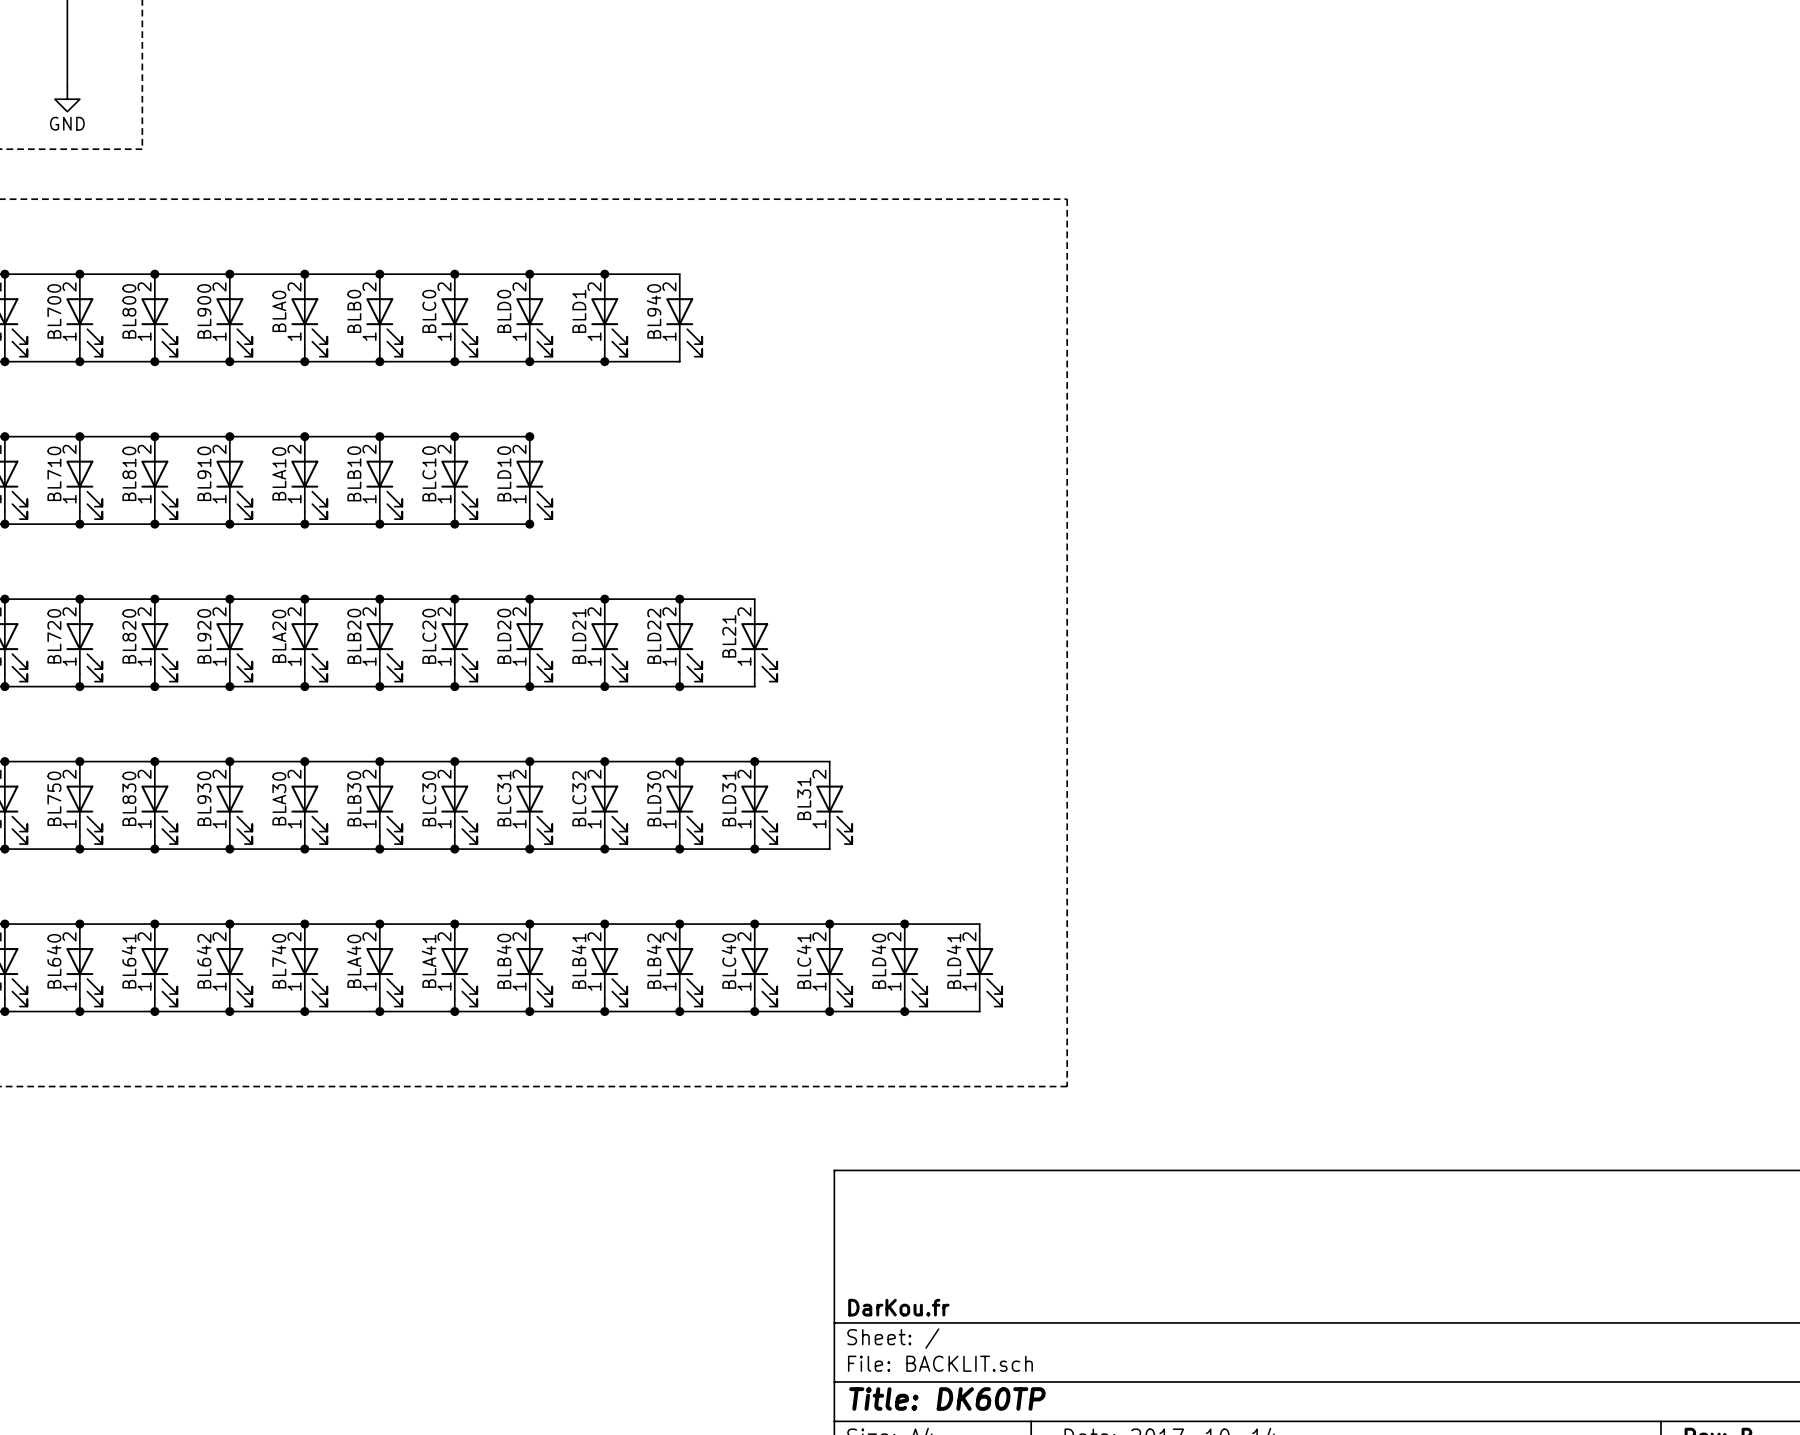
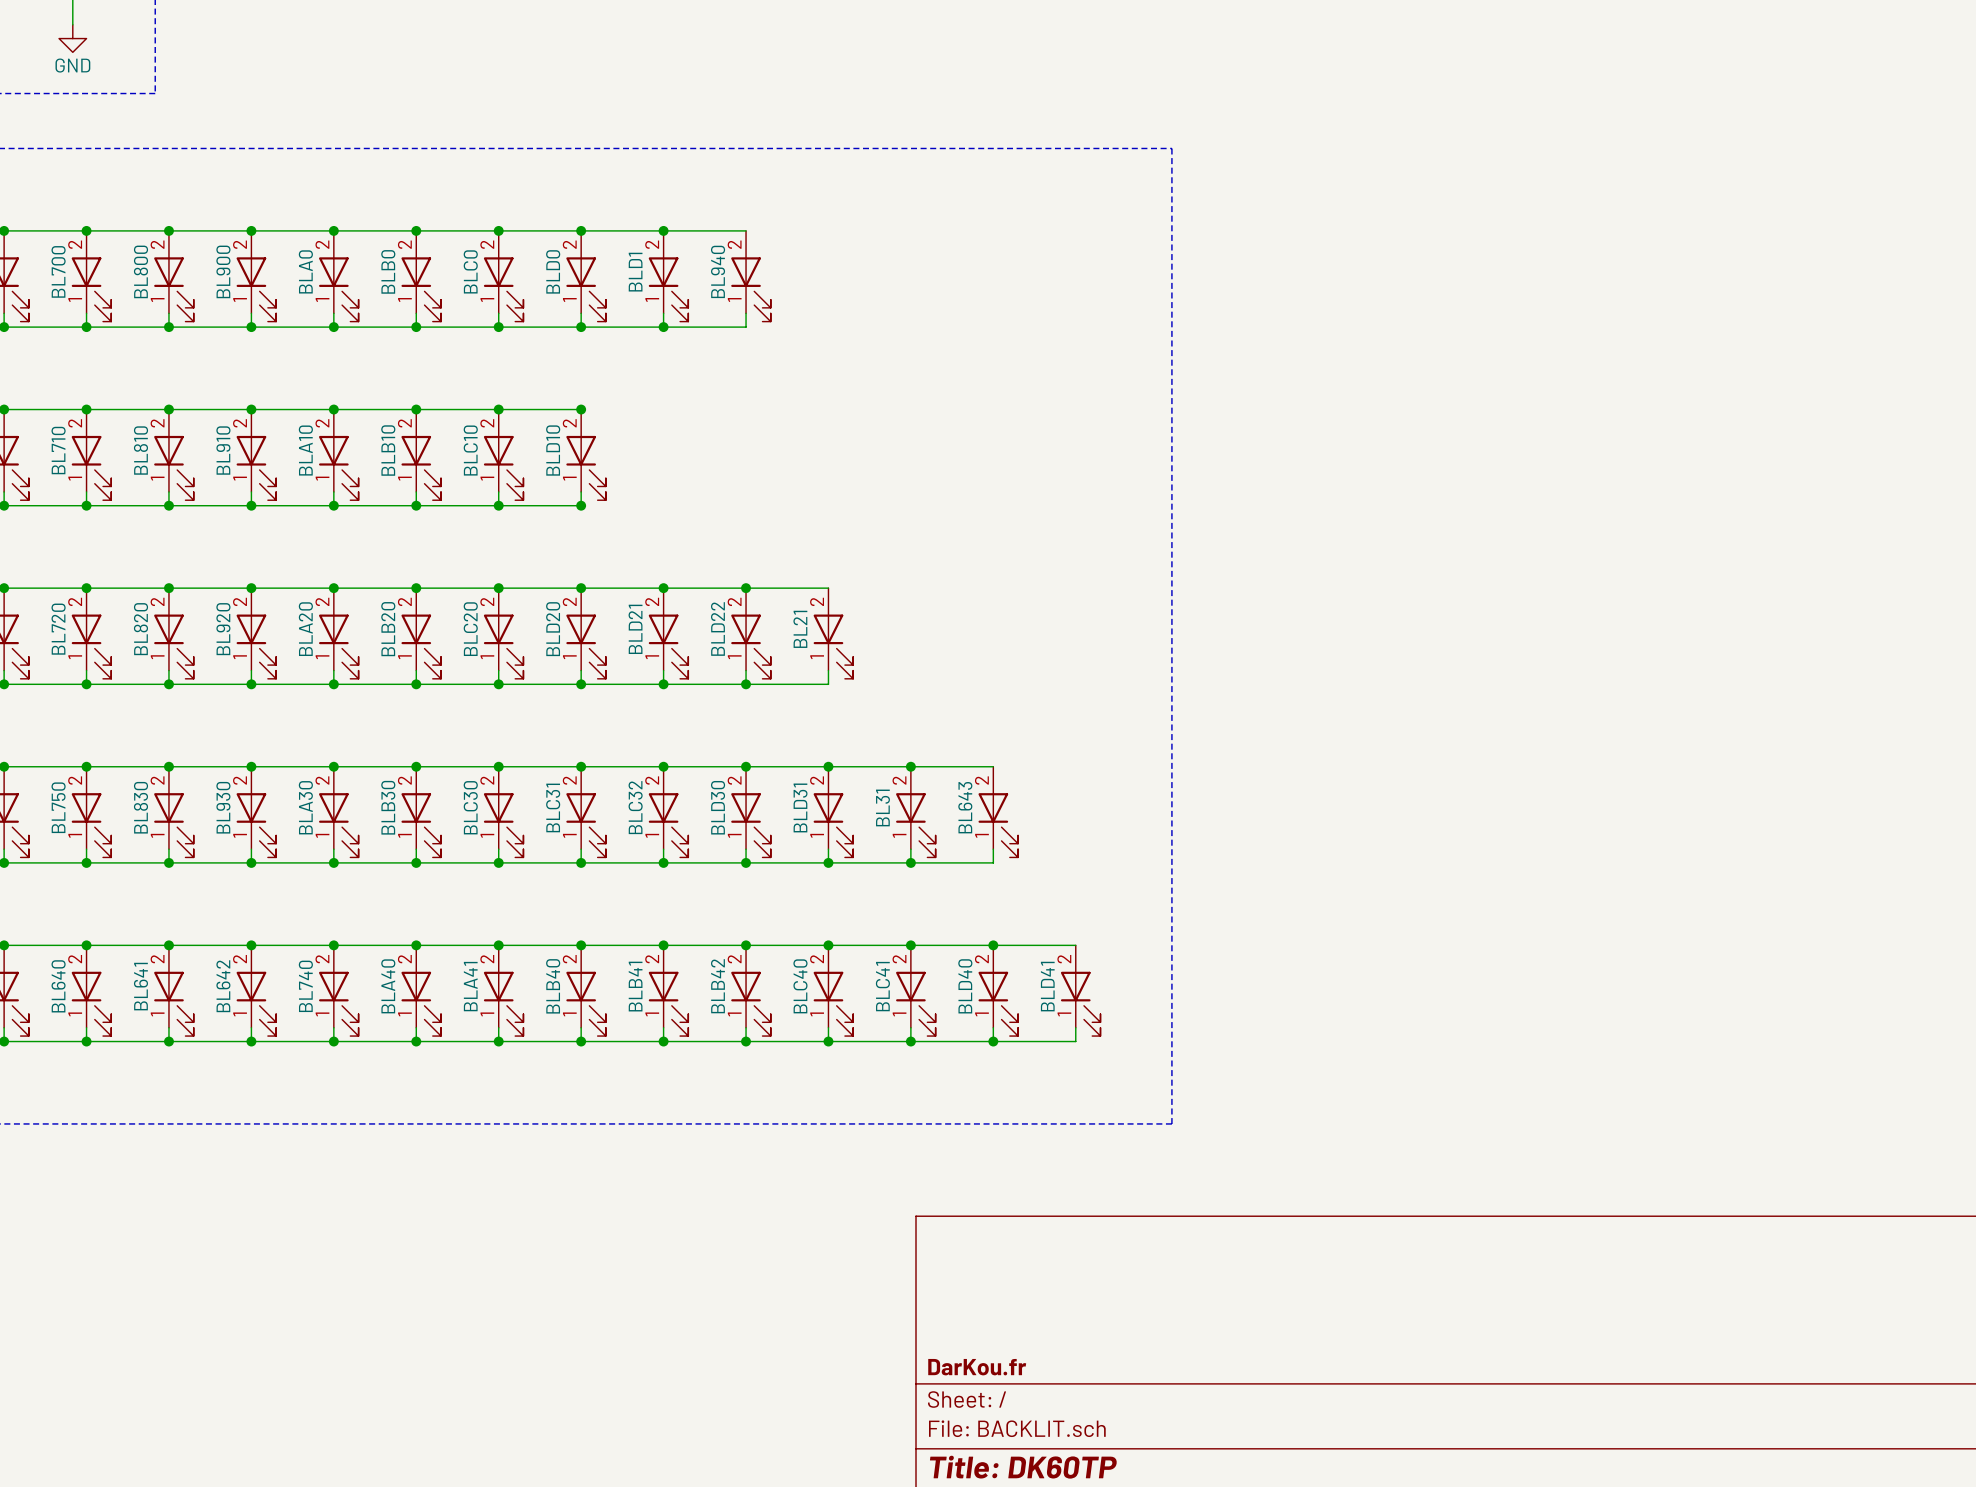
wire: none -> (910, 766) (993, 766)
junction: none -> (910, 766)
BL643: none -> (998, 812)
wire: none -> (993, 849) (993, 862) (910, 862)
junction: none -> (910, 862)

